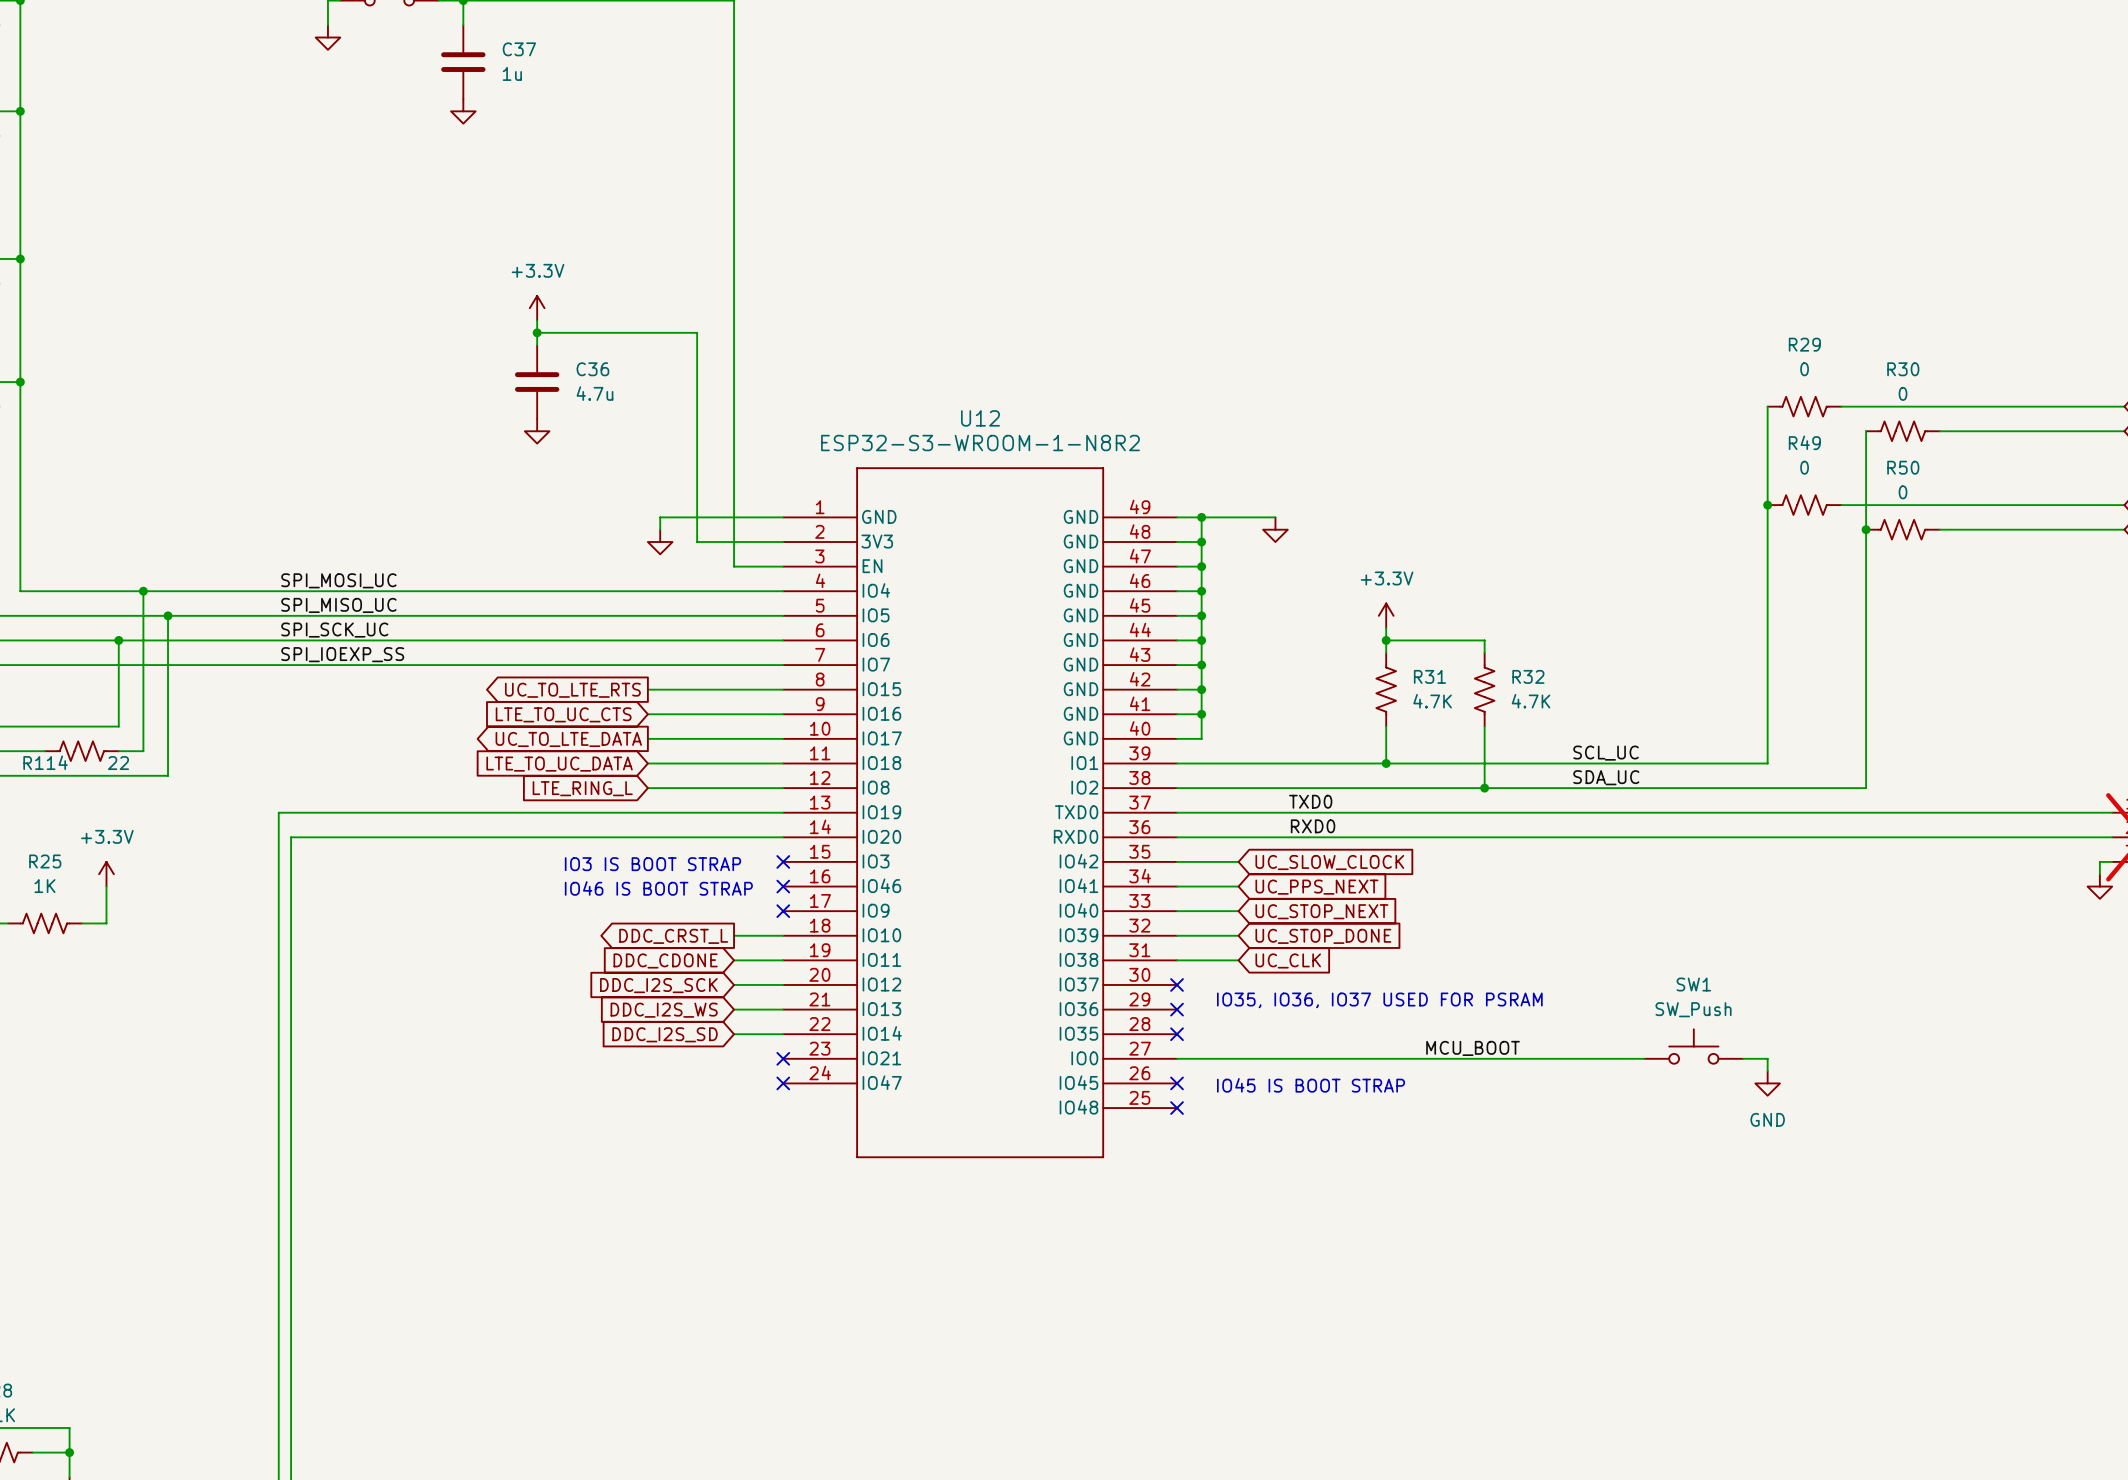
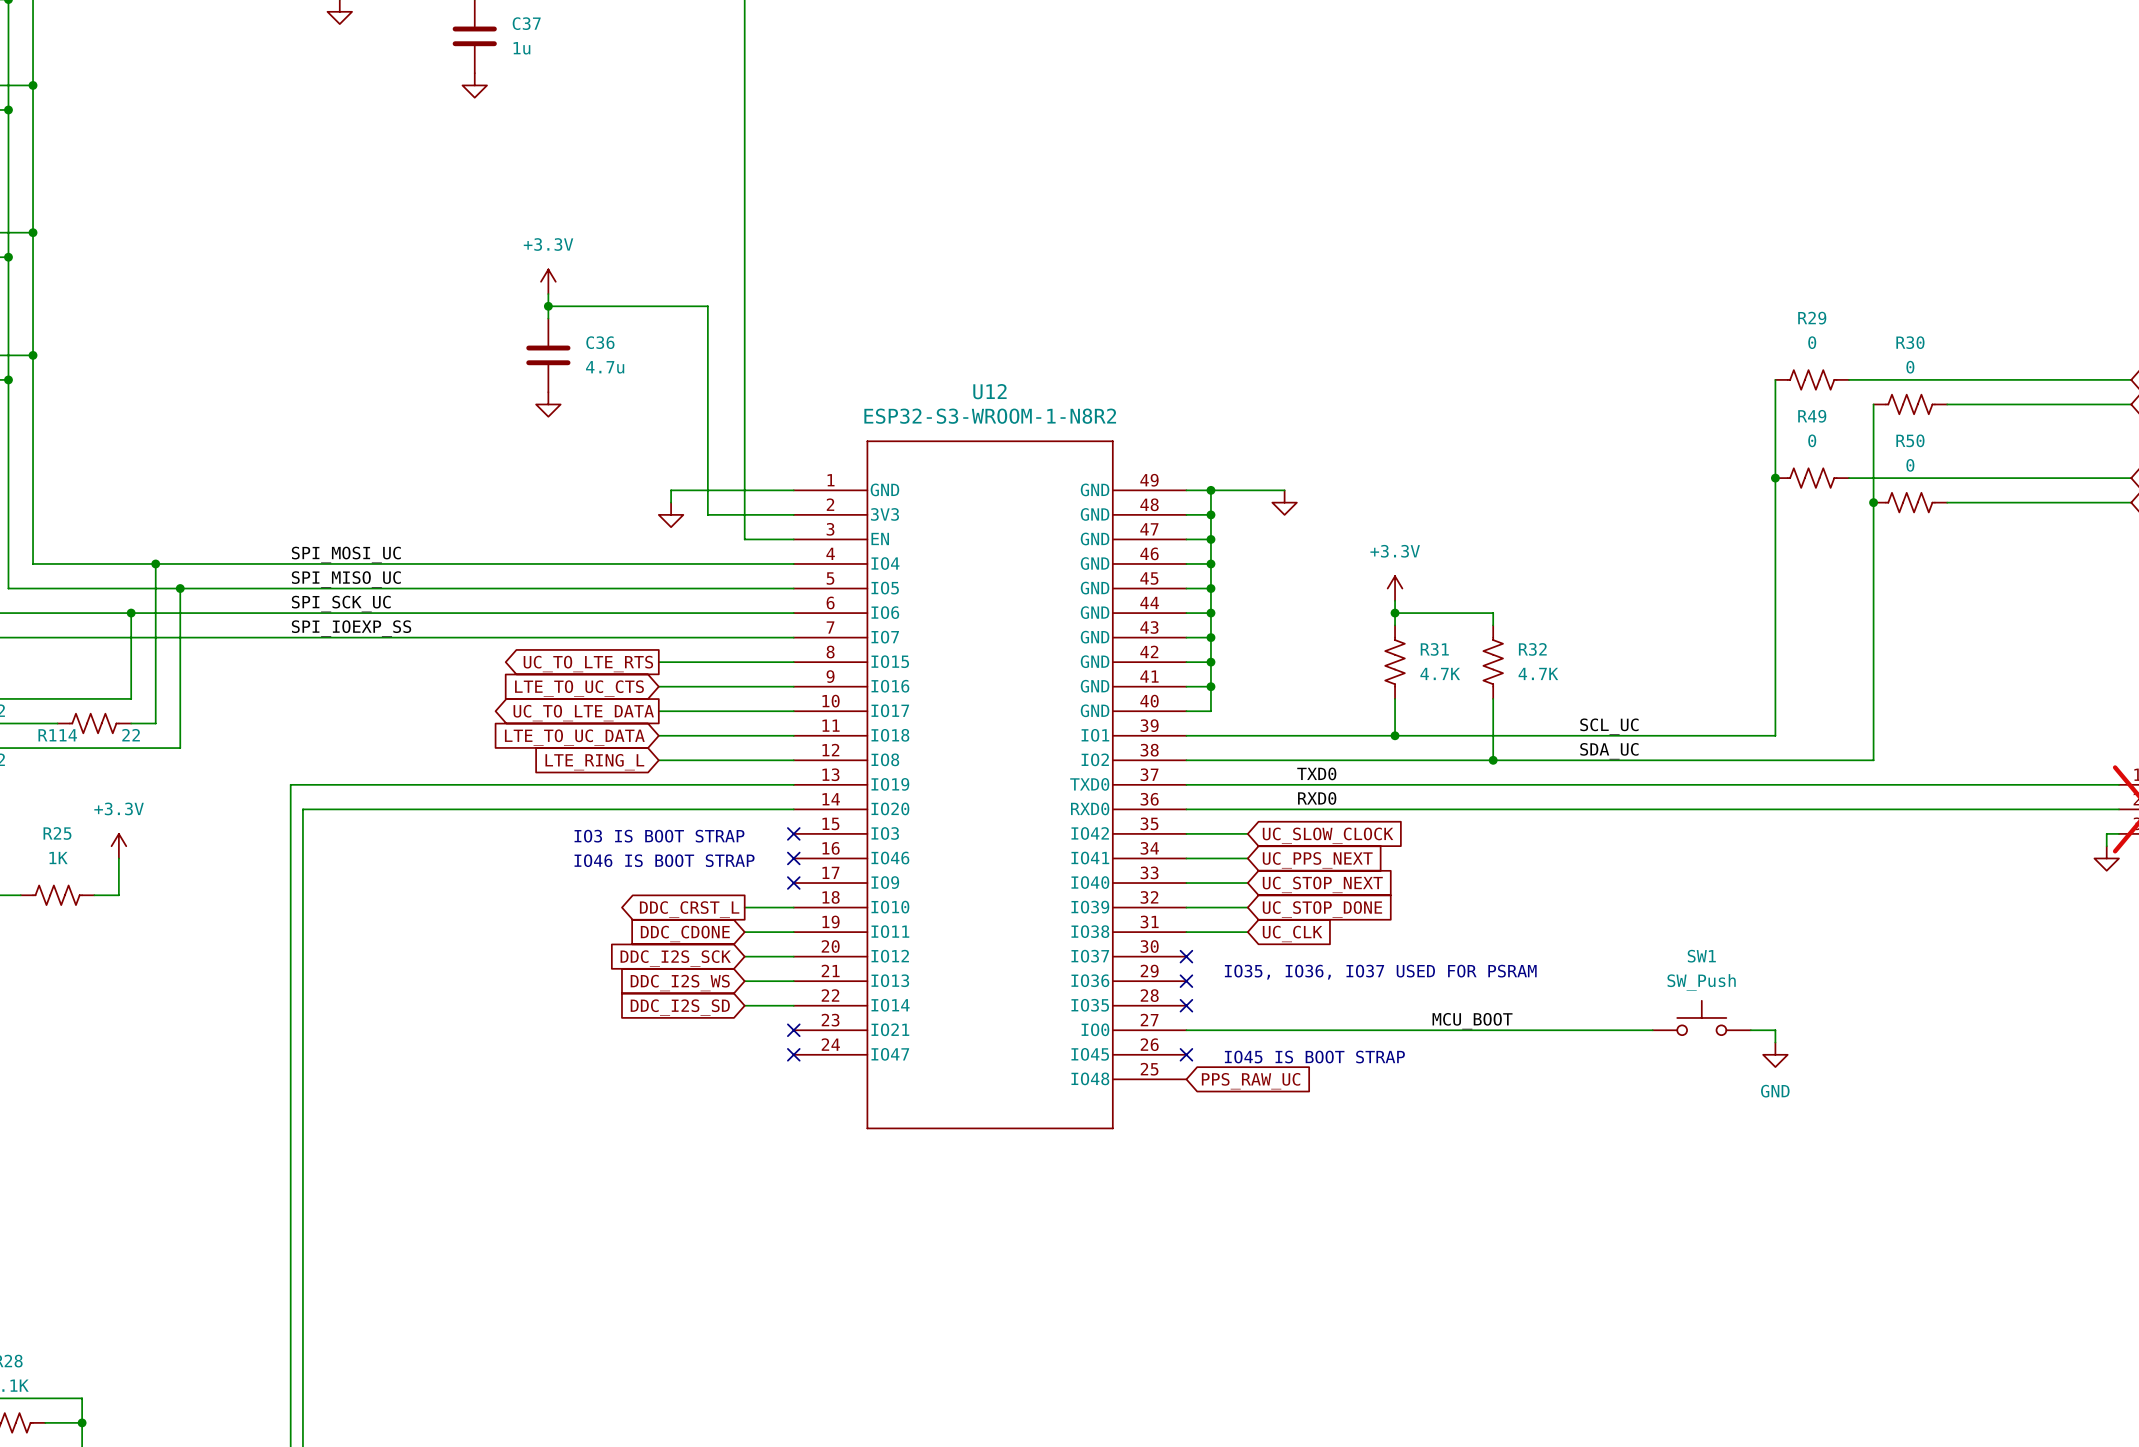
no-connect mark: (1177, 1108) -> none
global label: none -> PPS_RAW_UC (1251, 1081)

